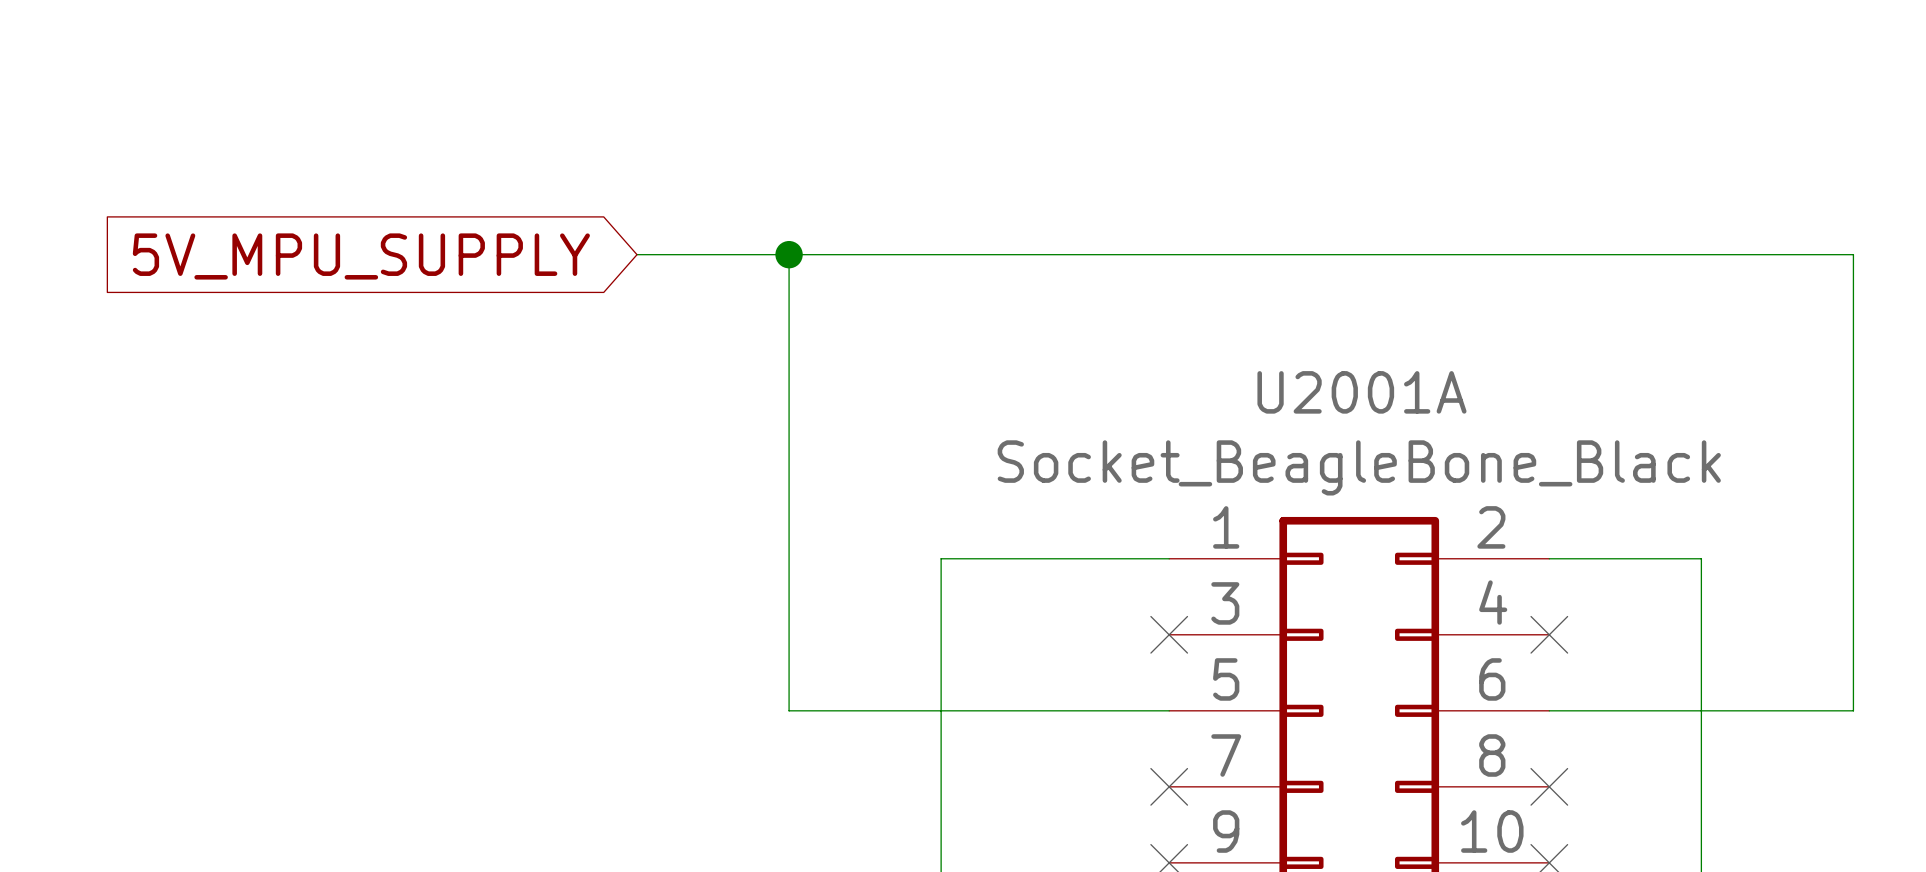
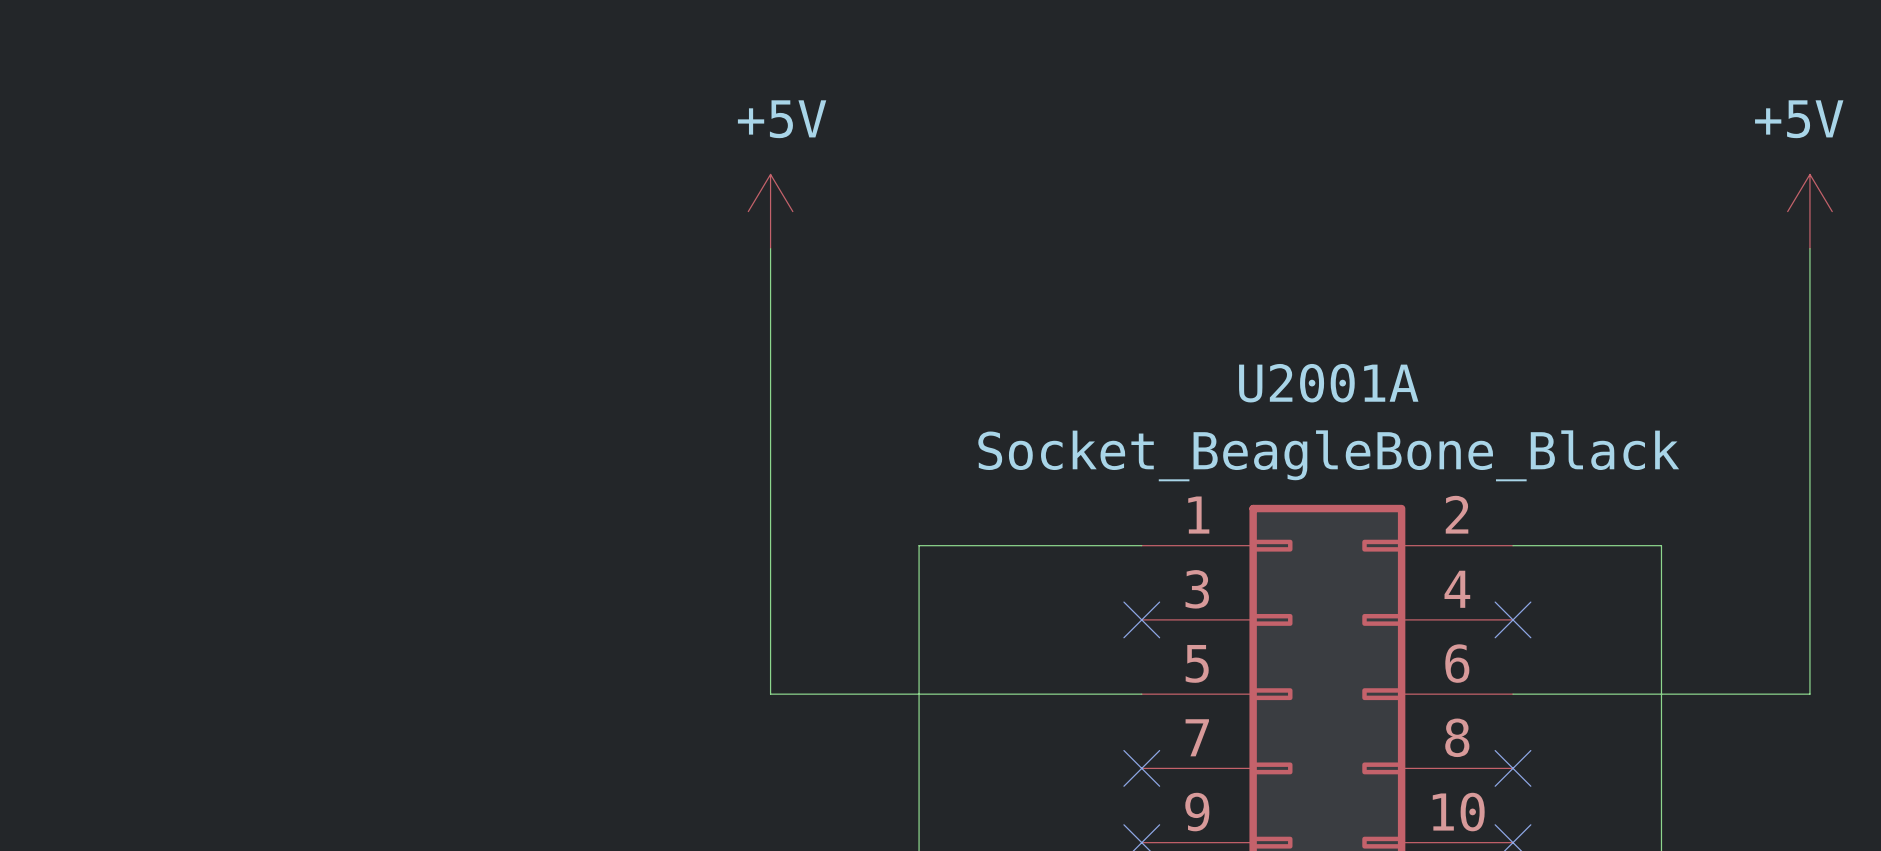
power symbol: none -> +5V (770, 211)
power symbol: none -> +5V (1809, 211)
wire: (637, 254) (1853, 254) -> none
junction: (789, 254) -> none
global label: 5V_MPU_SUPPLY (361, 256) -> none

